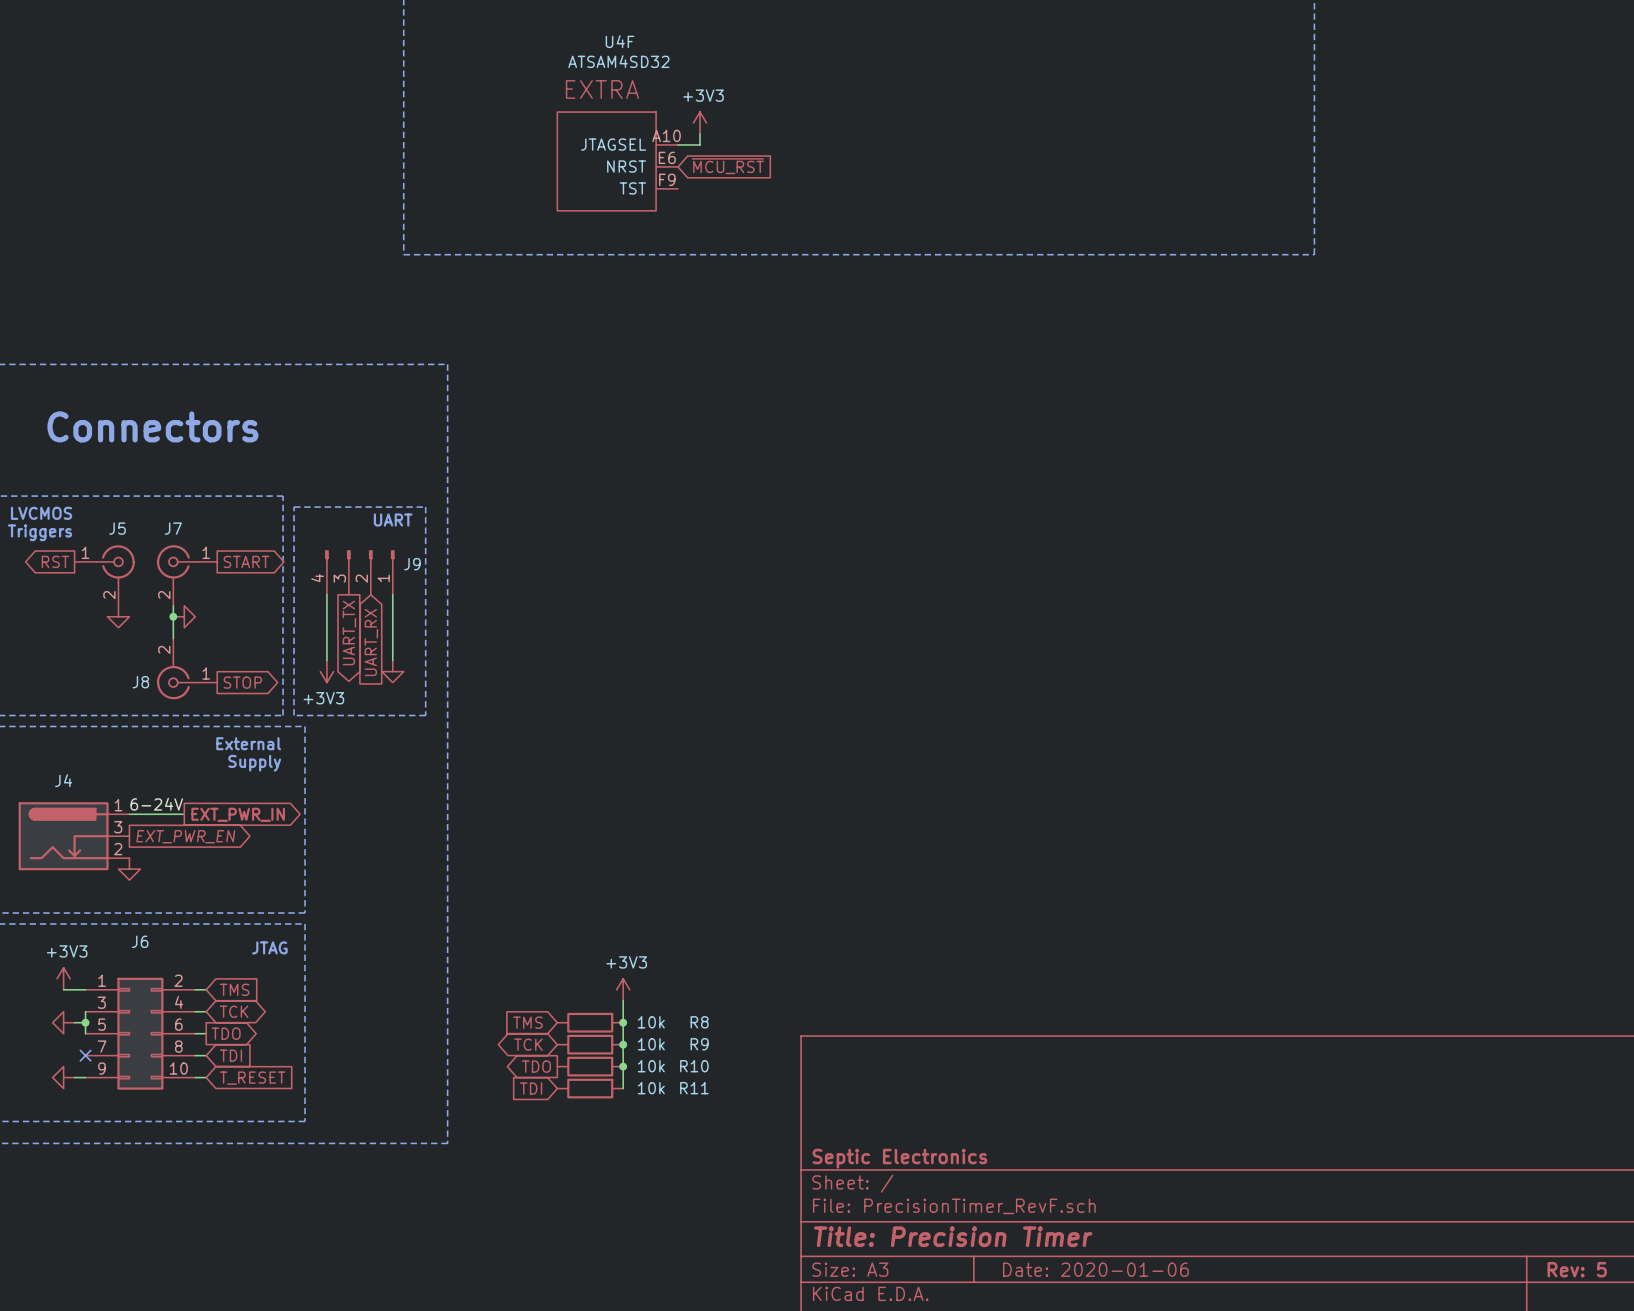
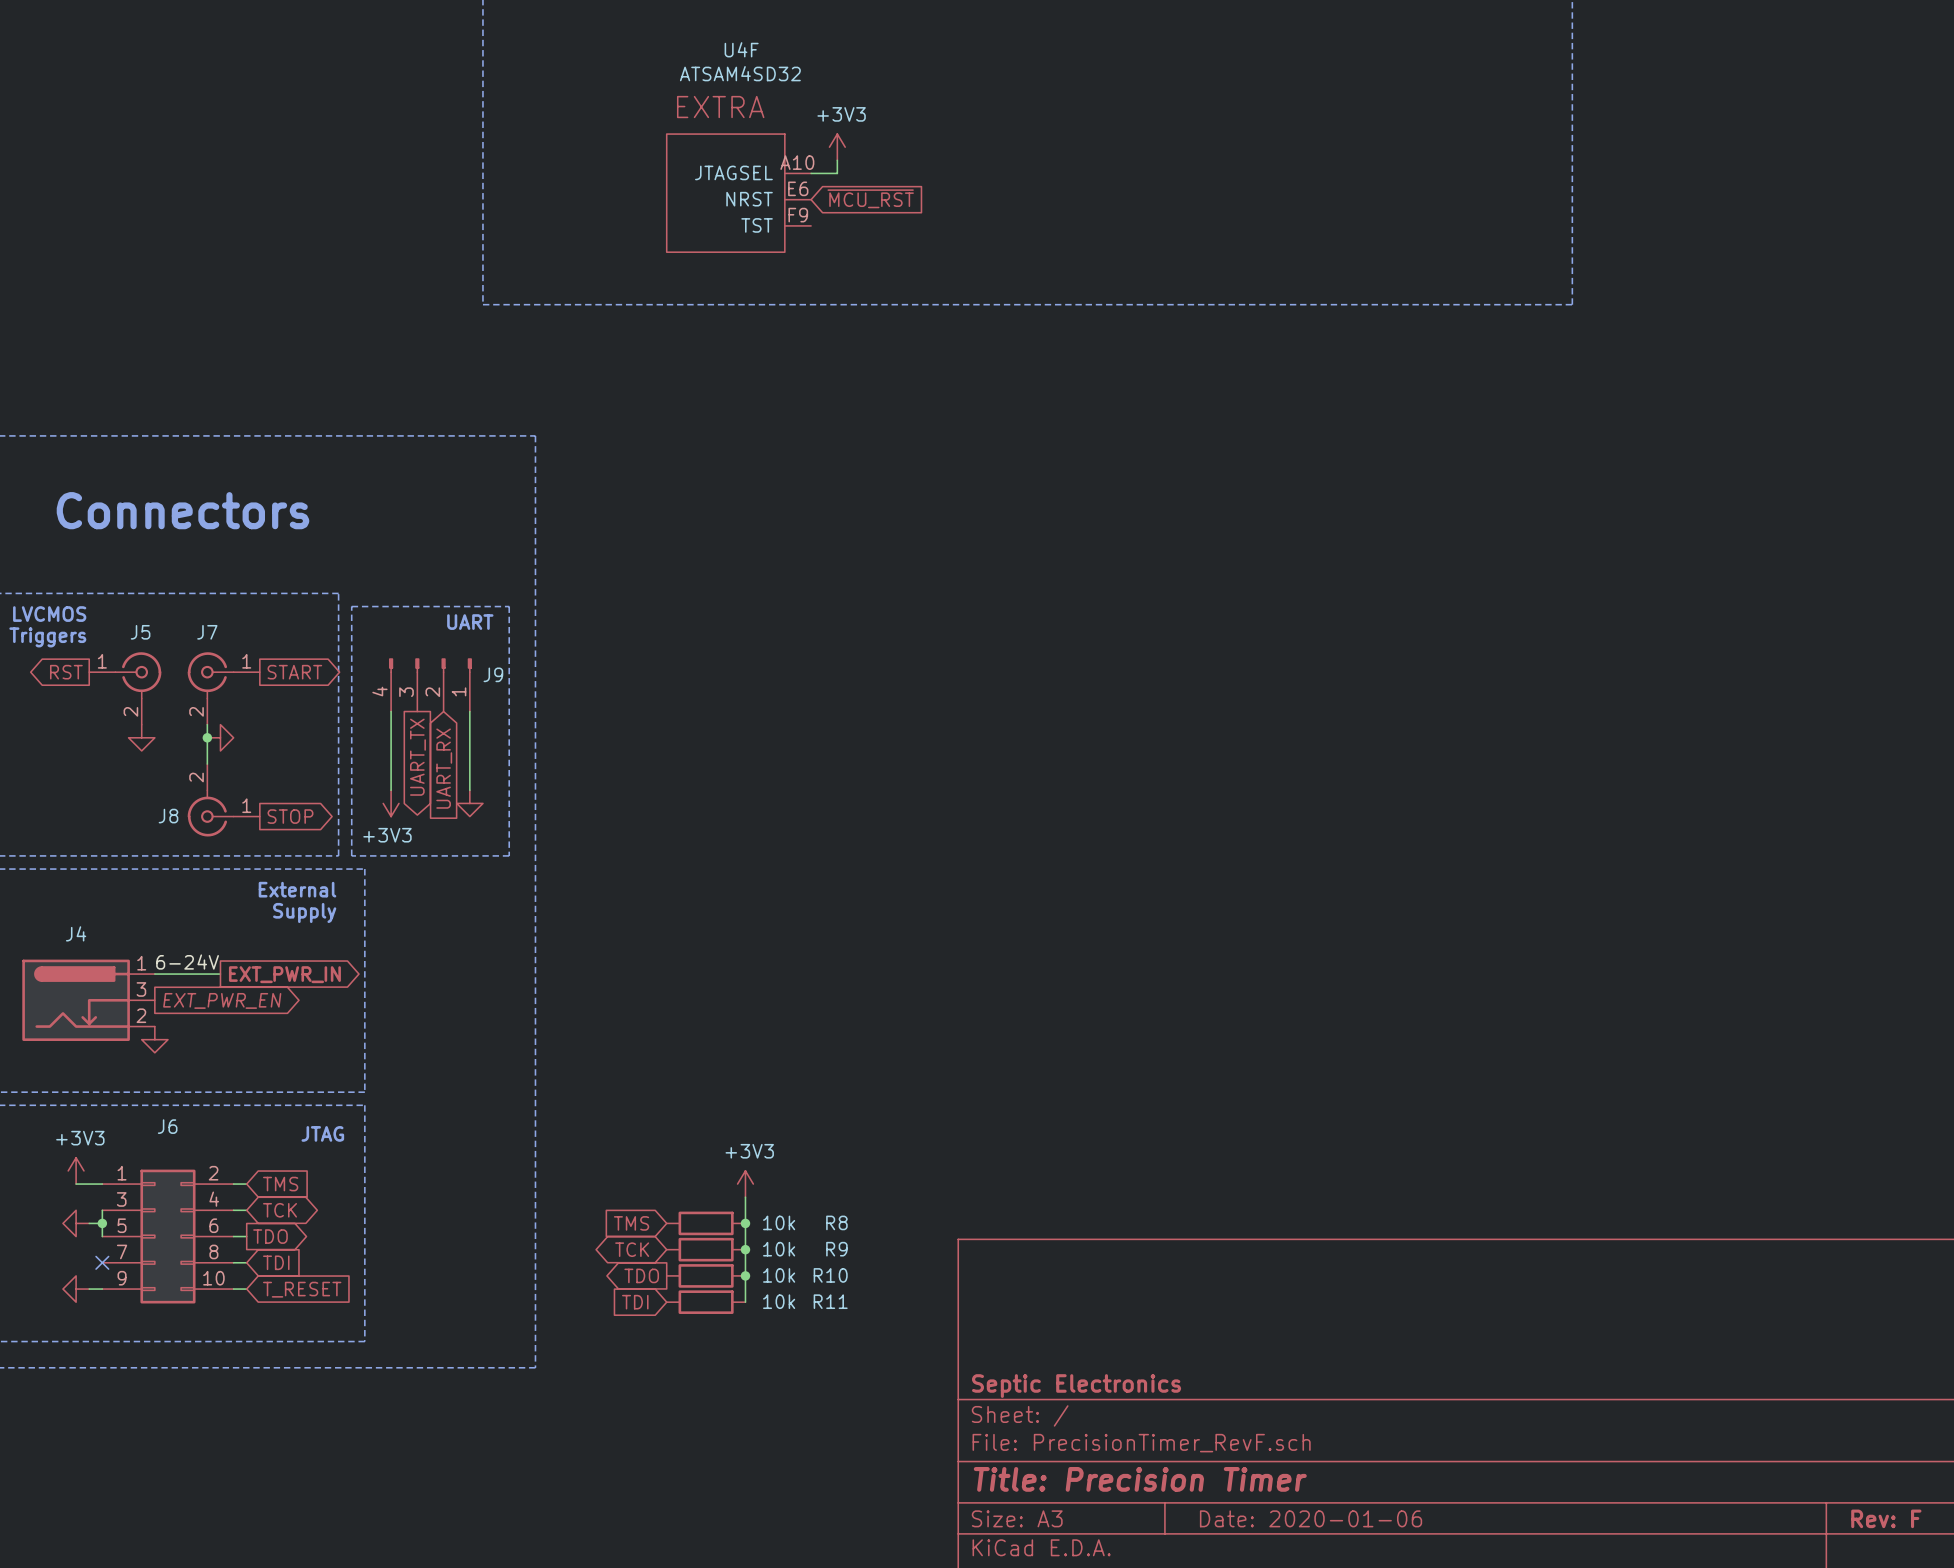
title block: Rev: 5 (1577, 1269) -> Rev: F (1886, 1518)

